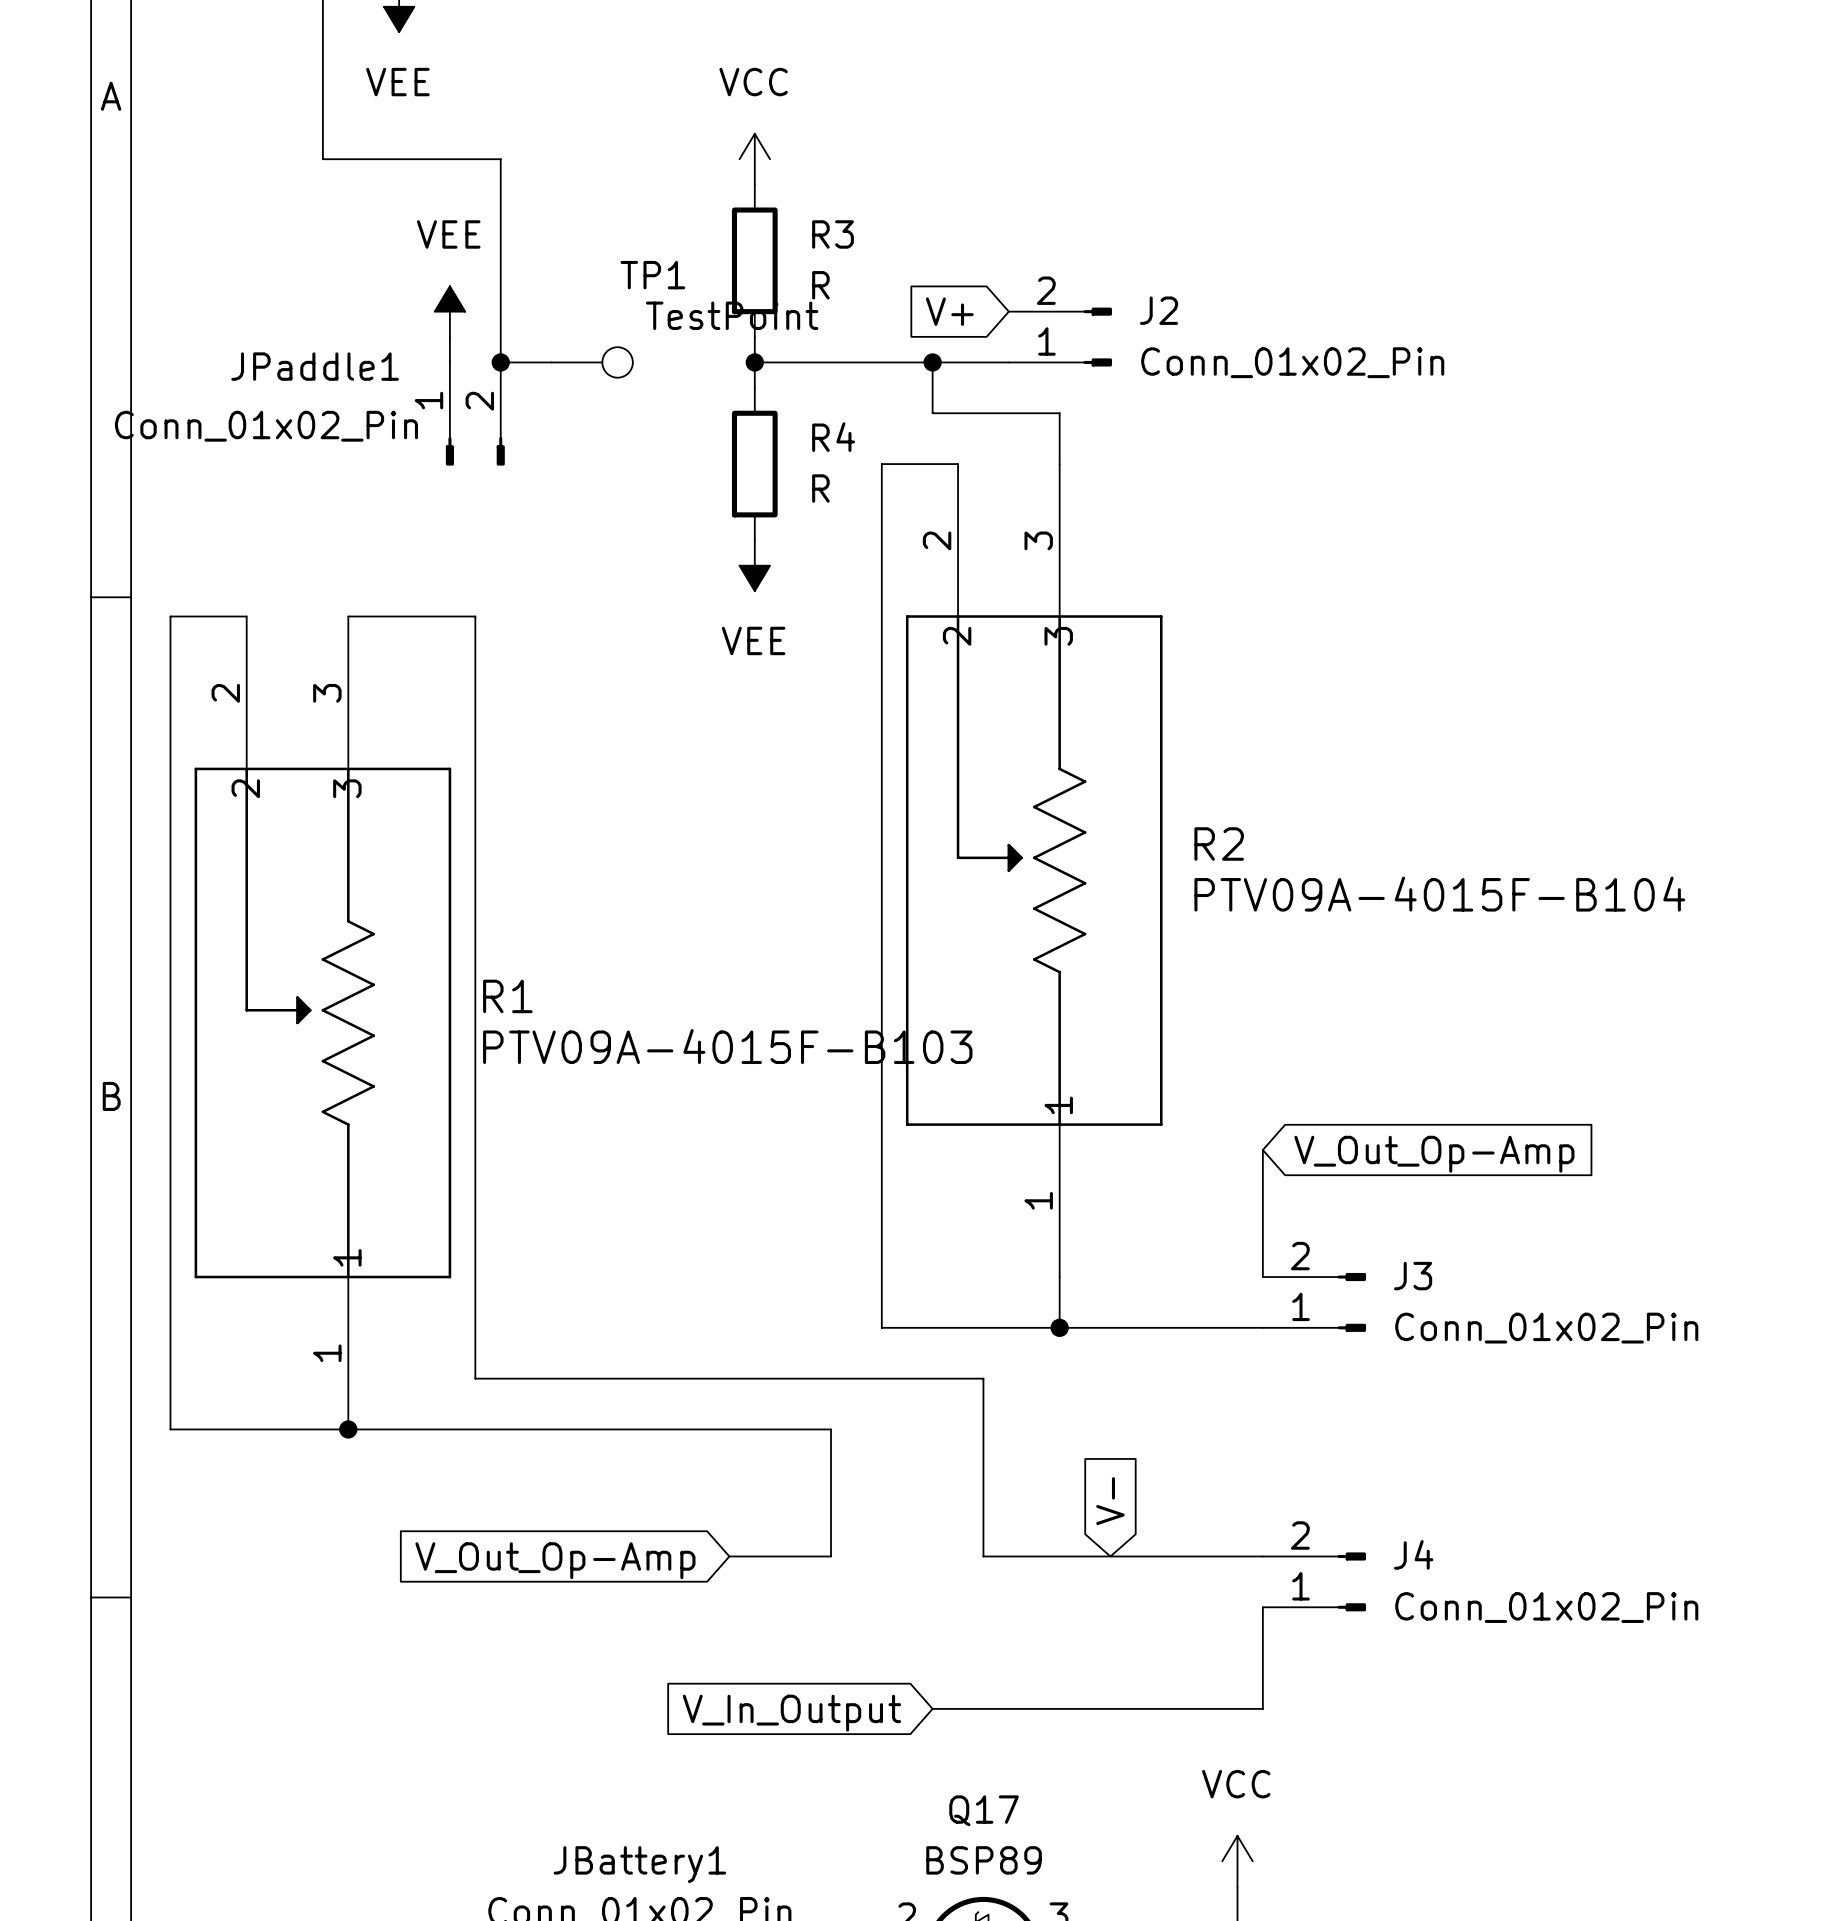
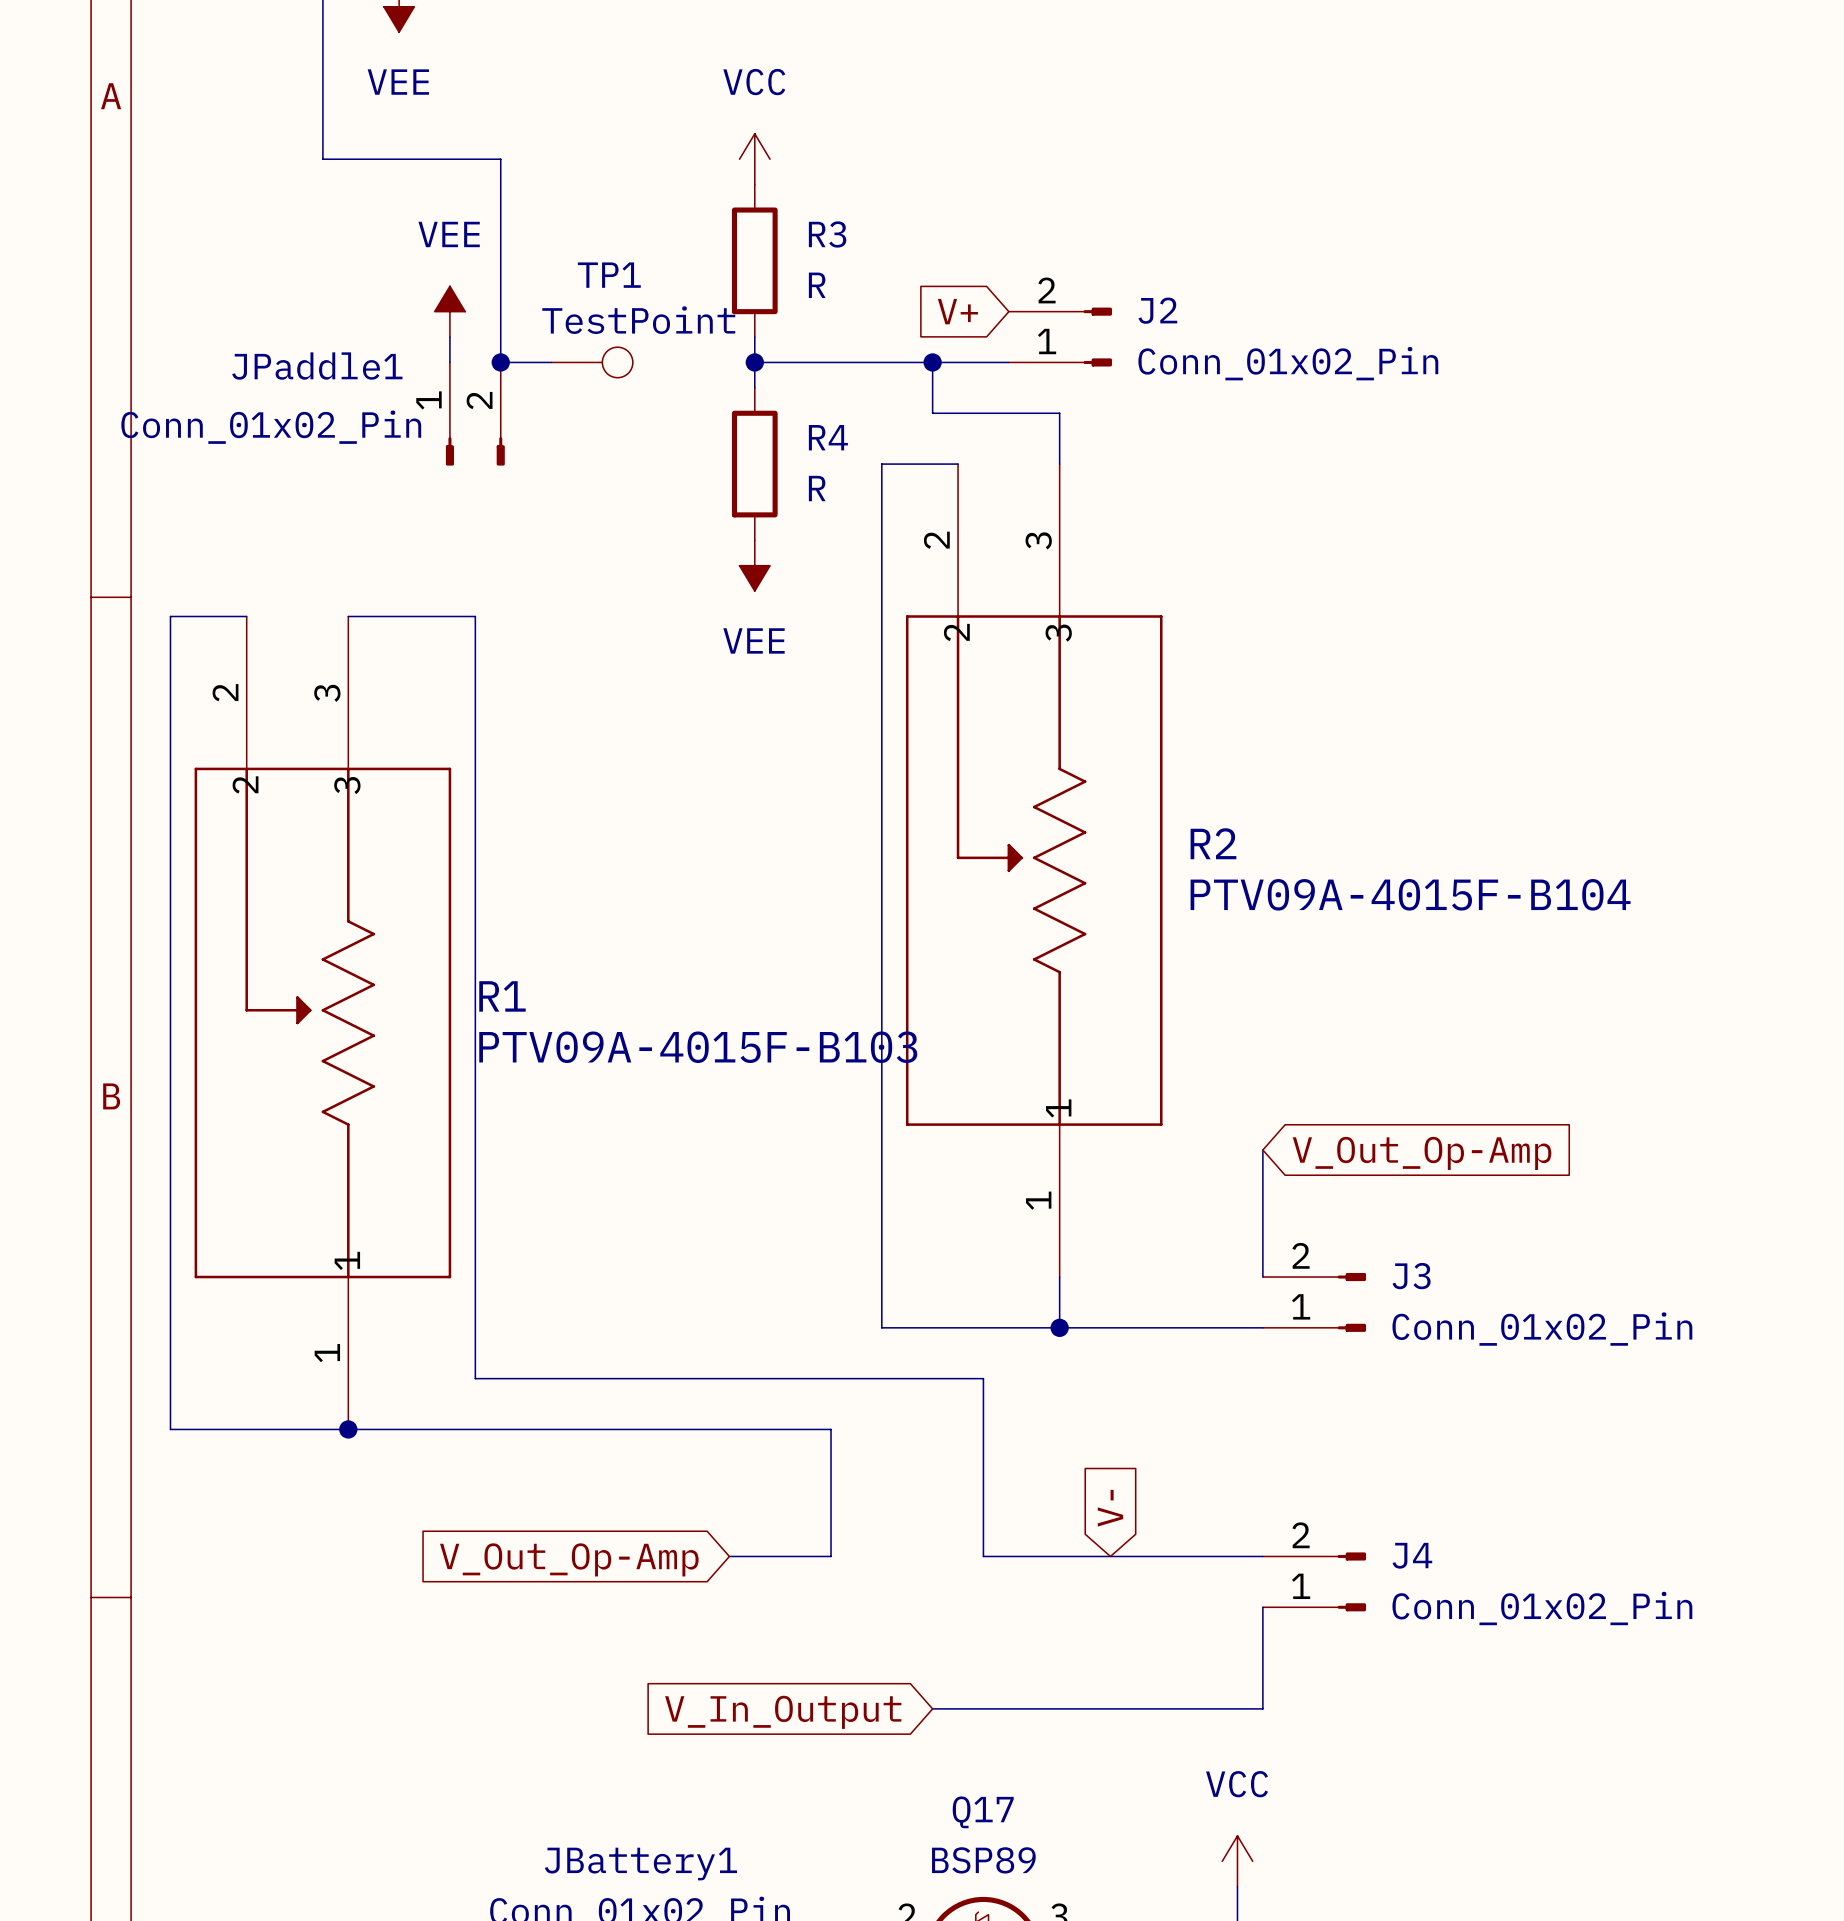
TP1 name position: TP1 (652, 275) -> TP1 (609, 275)
TP1 value position: TestPoint (732, 315) -> TestPoint (638, 320)

